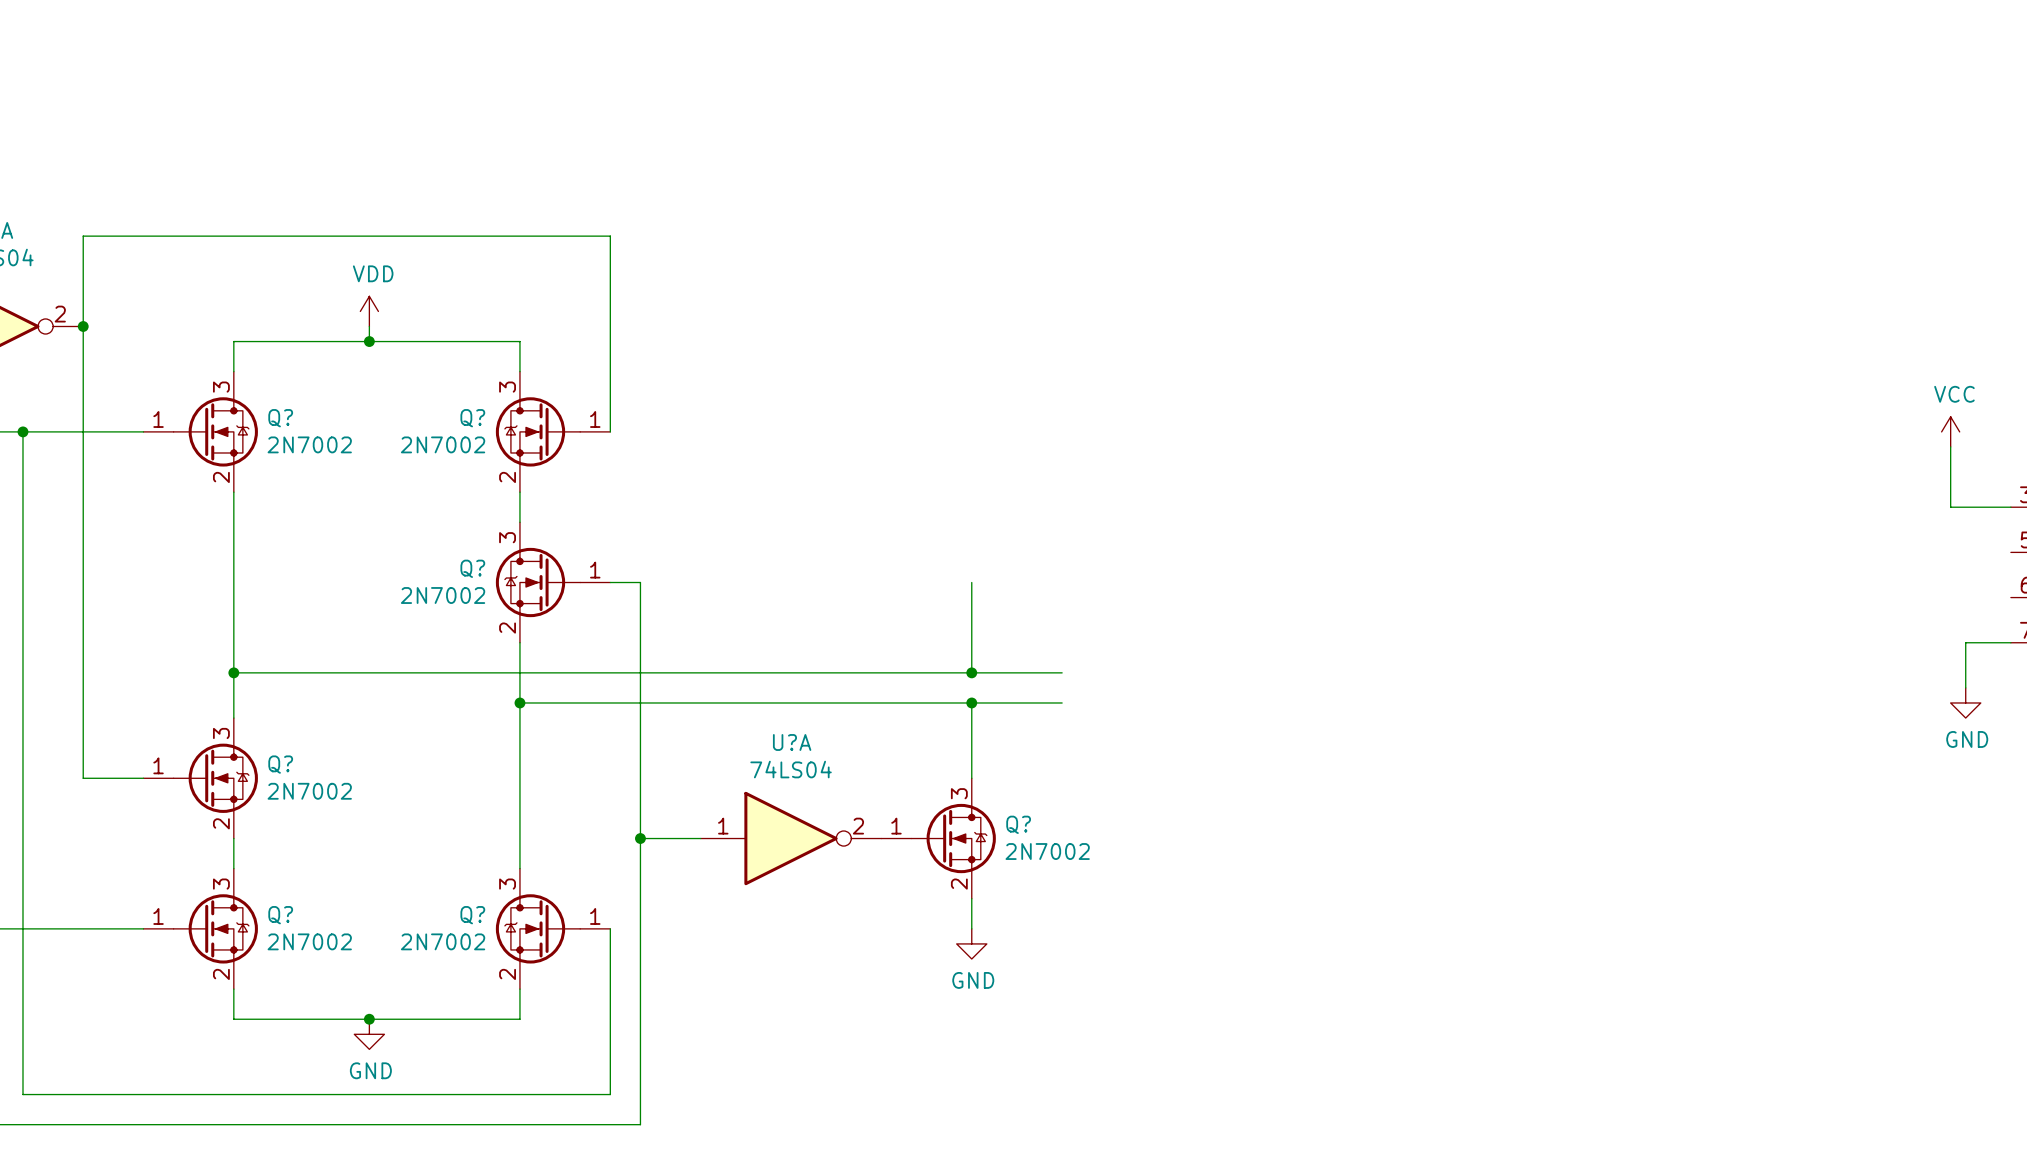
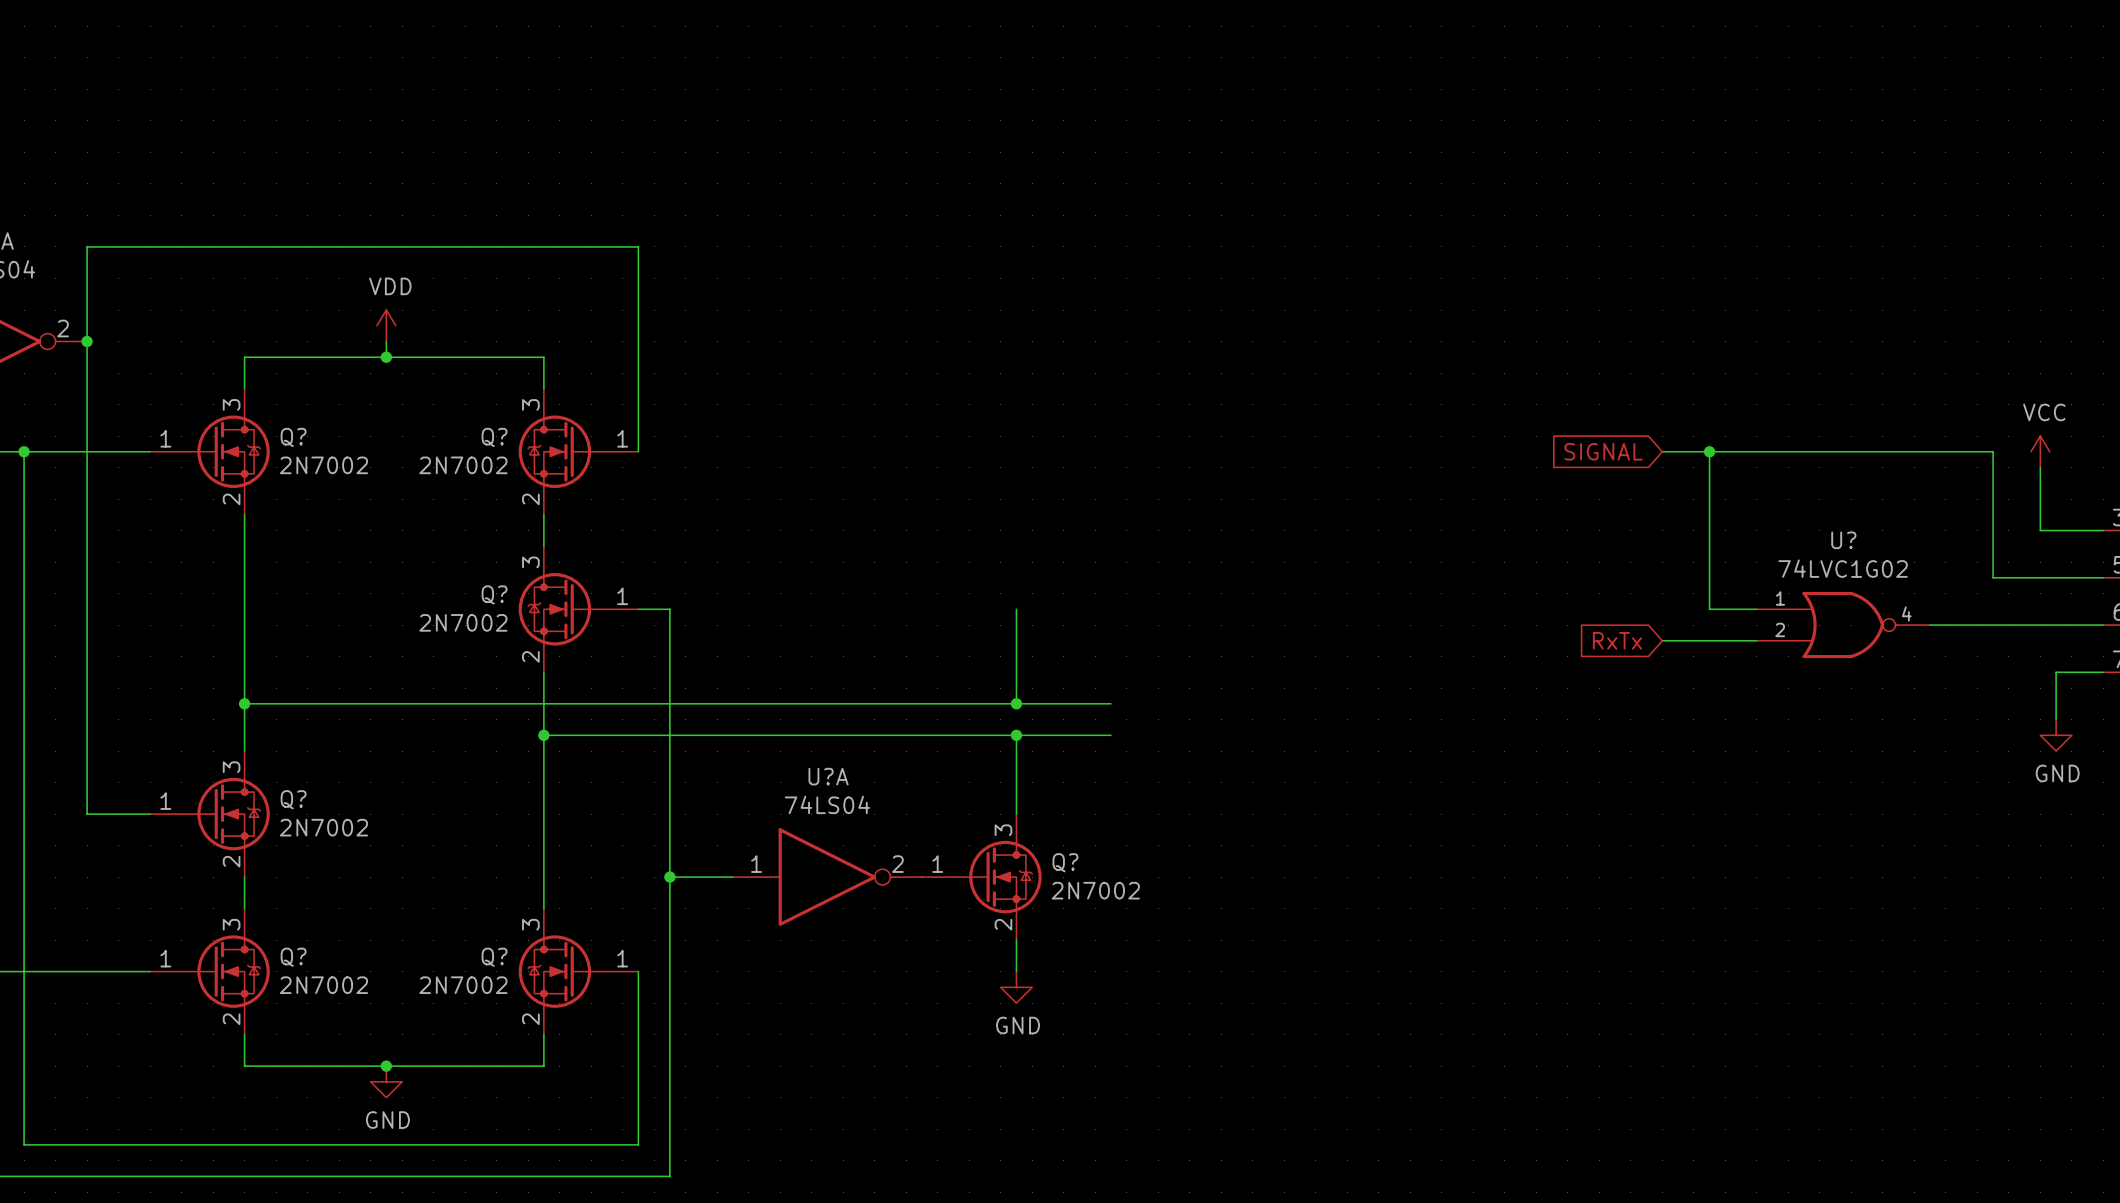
global label: none -> SIGNAL (1603, 451)
wire: none -> (1662, 451) (1993, 451) (1993, 577) (2103, 577)
wire: none -> (1709, 451) (1709, 609) (1756, 609)
junction: none -> (1709, 451)
U?: none -> 74LVC1G02 (1843, 625)
wire: none -> (1930, 625) (2103, 625)
global label: none -> RxTx (1617, 640)
wire: none -> (1662, 640) (1756, 640)

